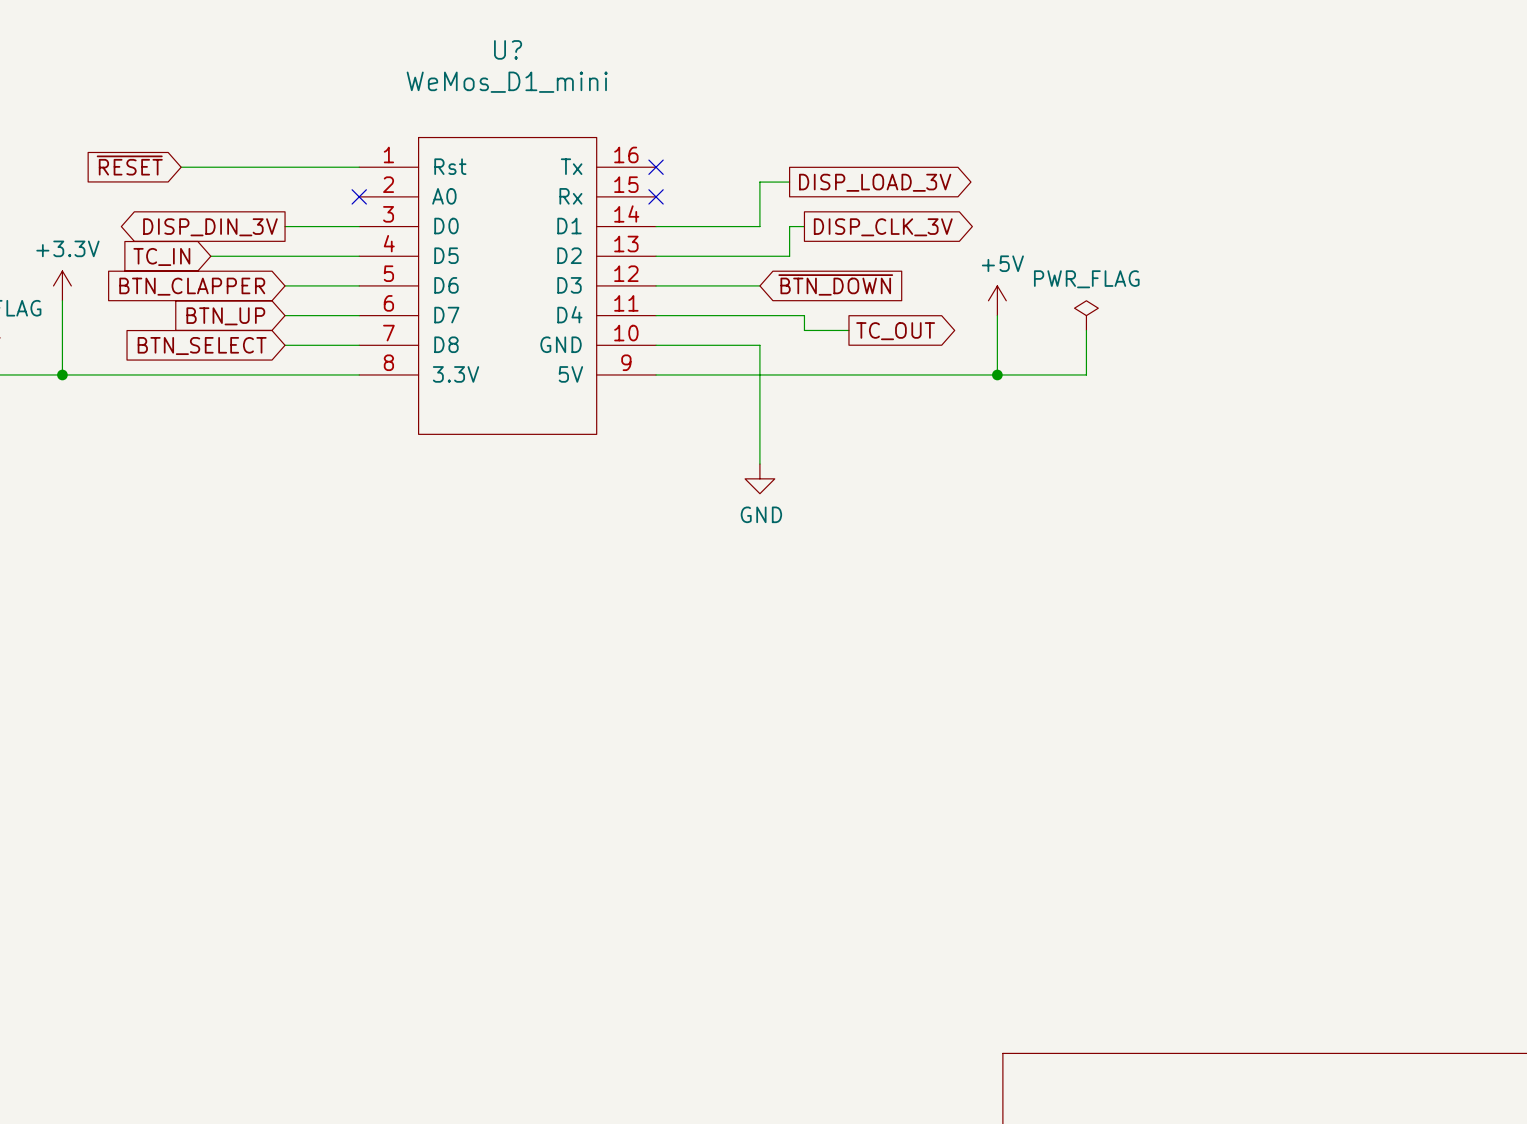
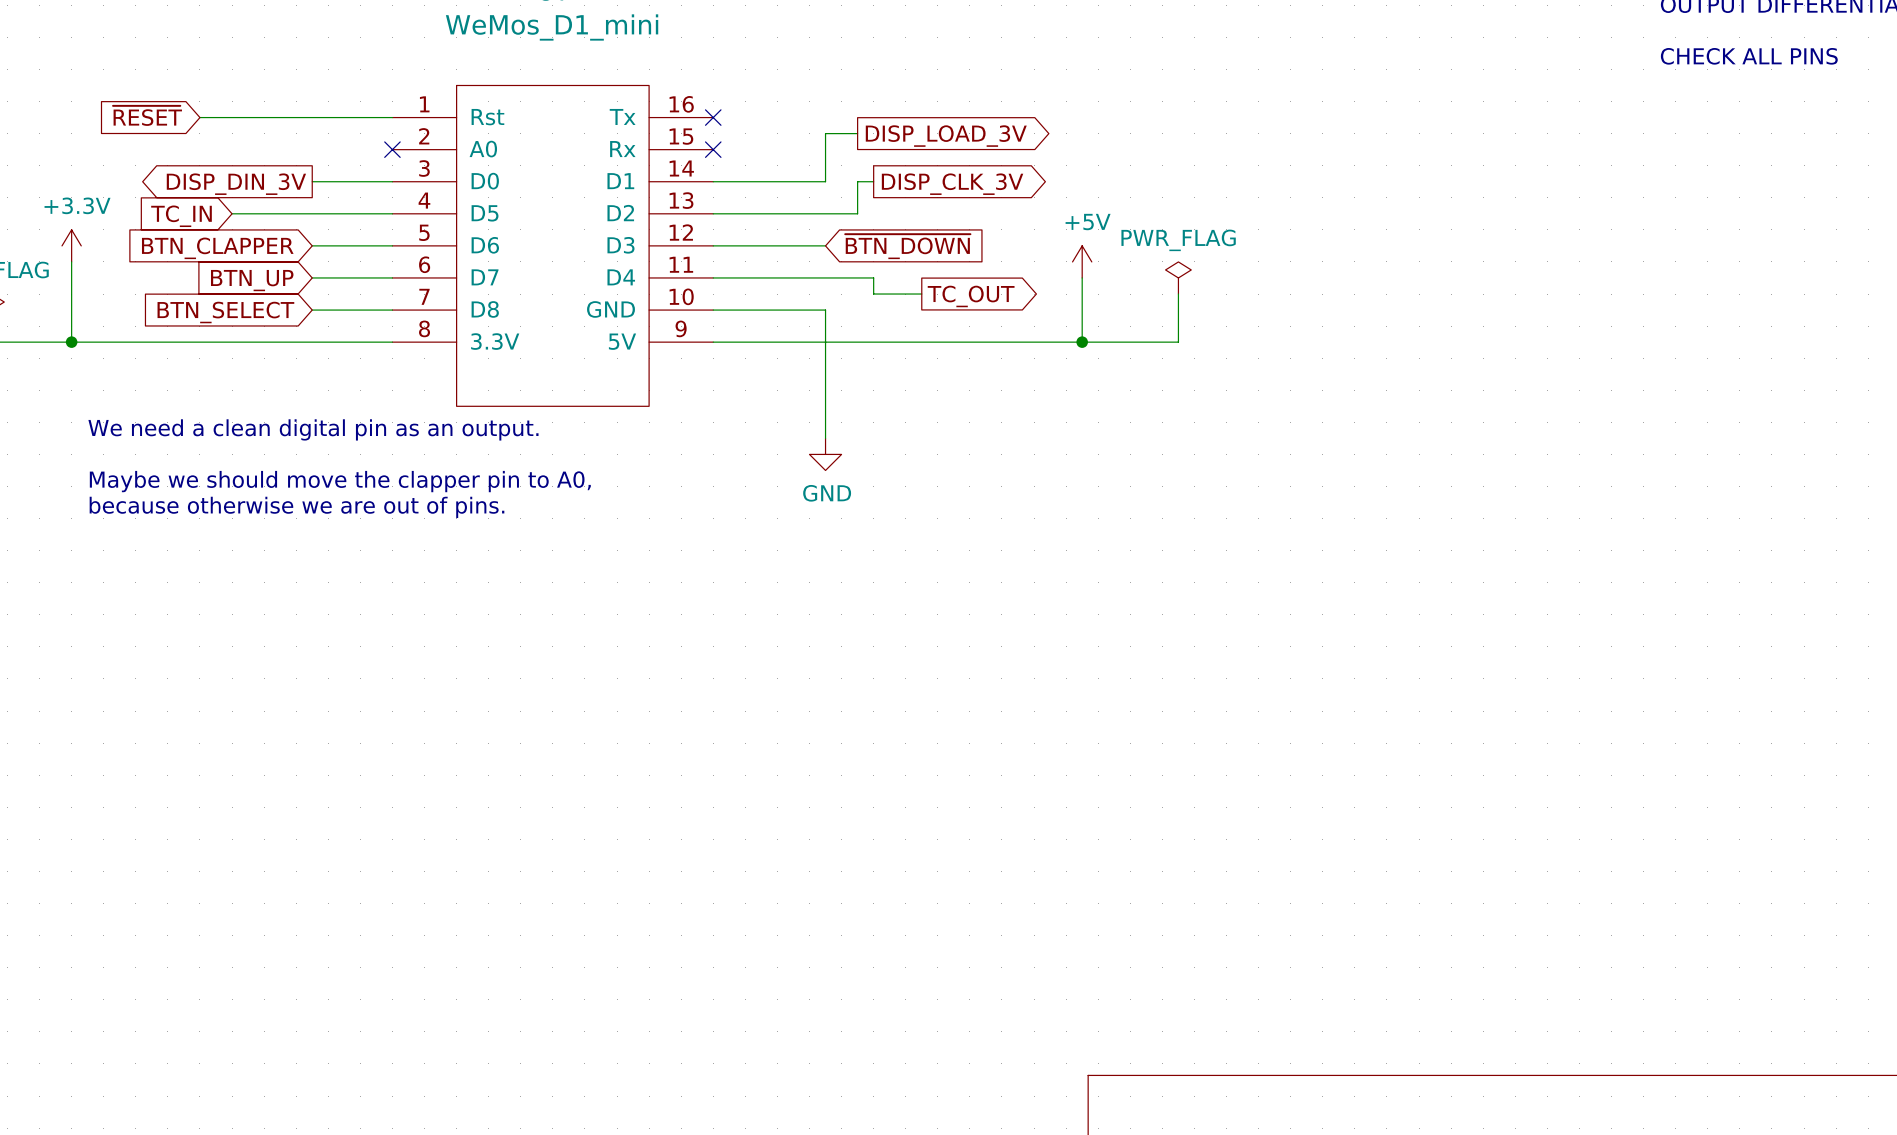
text: none -> We need a clean digital pin as an output. (313, 429)
text: none -> Maybe we should move the clapper pin to A0, (340, 481)
text: none -> because otherwise we are out of pins. (296, 507)

